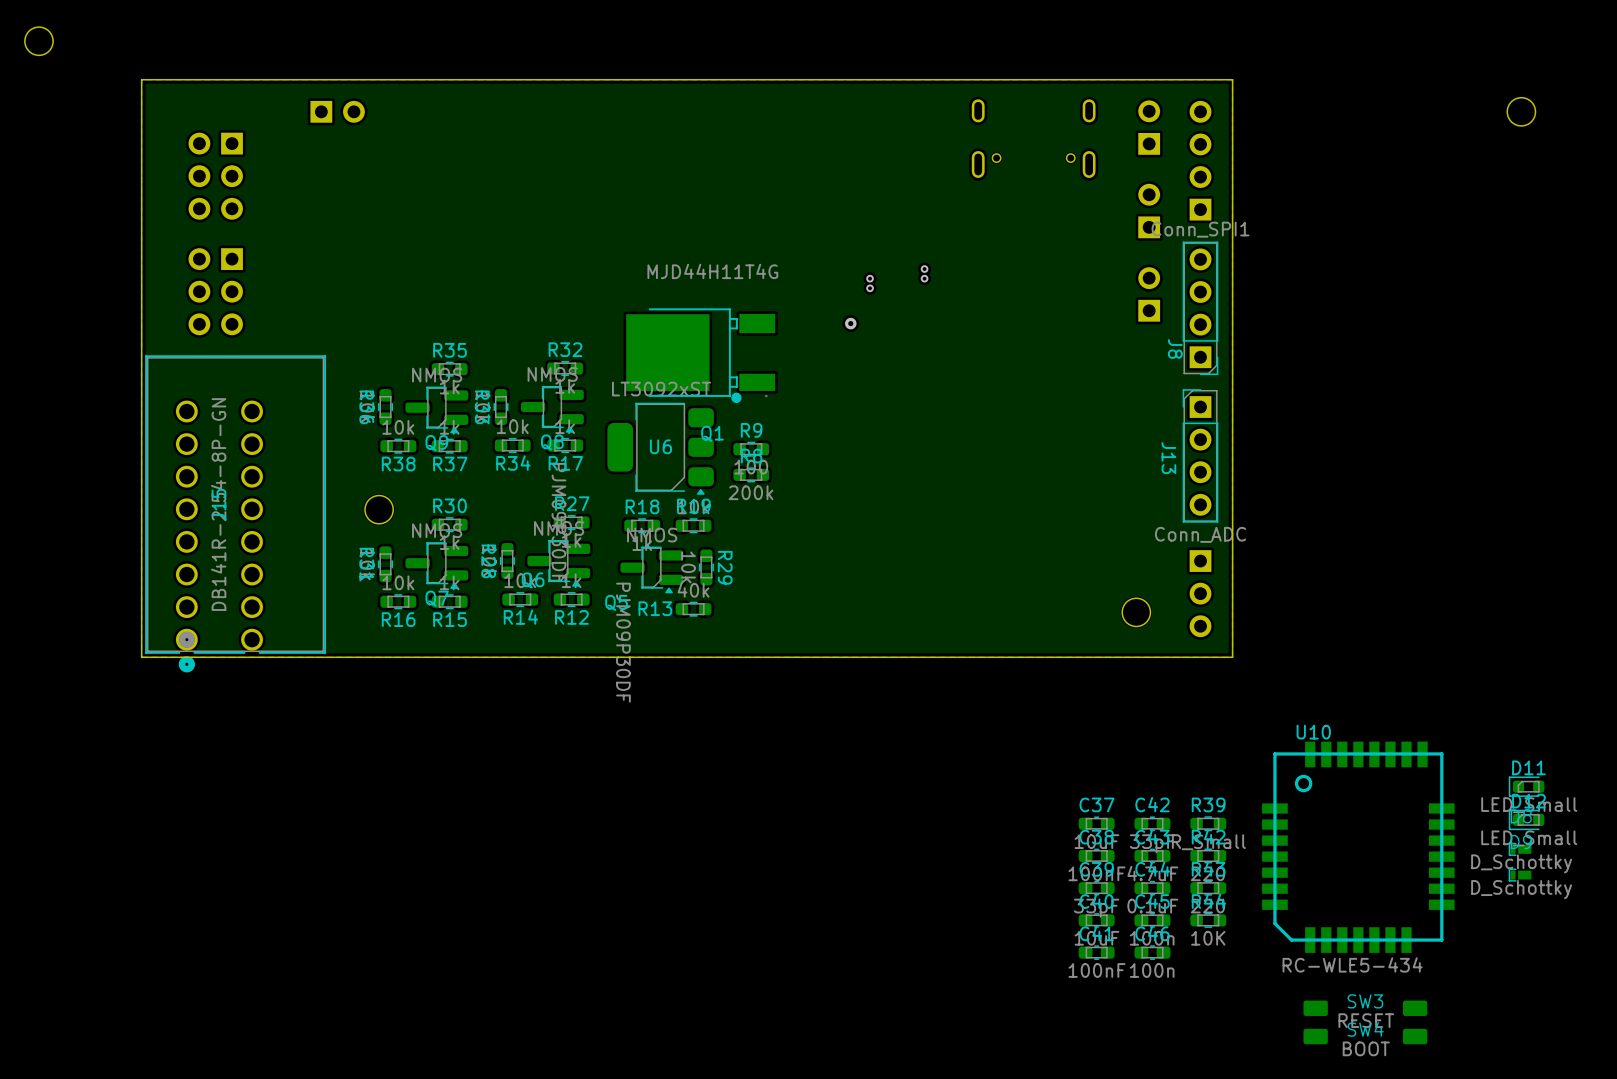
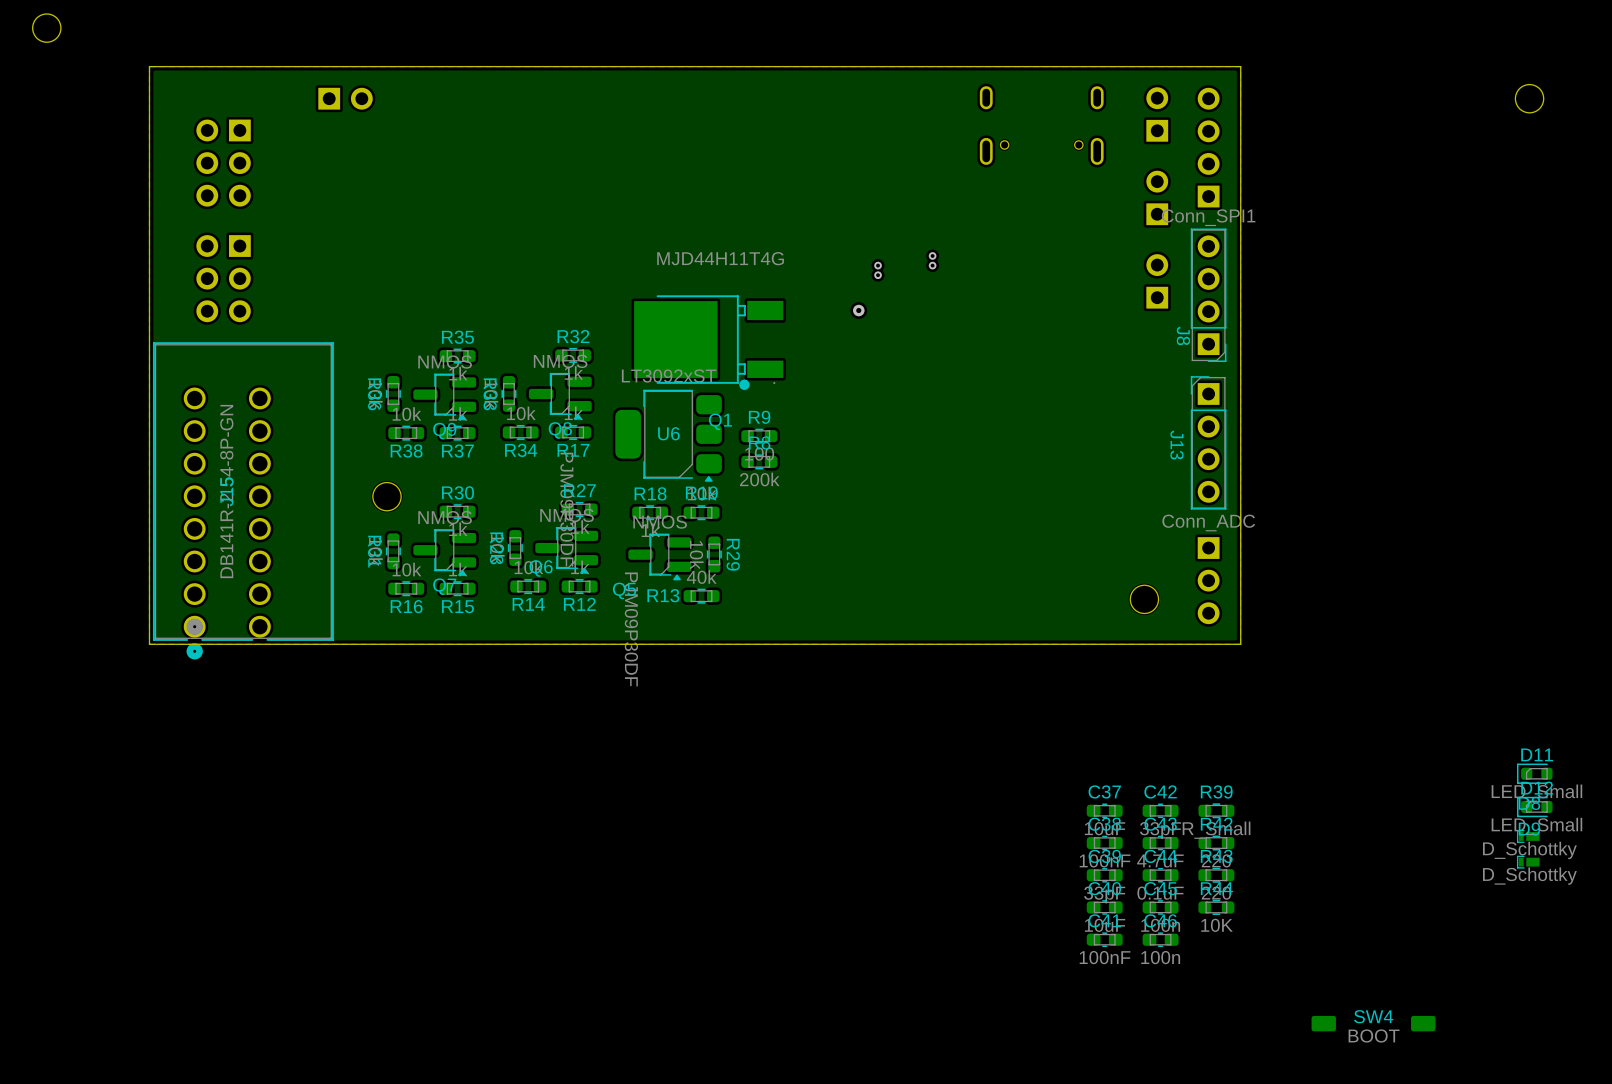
U10: RC-WLE5-434 (1358, 847) -> none
SW3: RESET (1365, 1008) -> none

